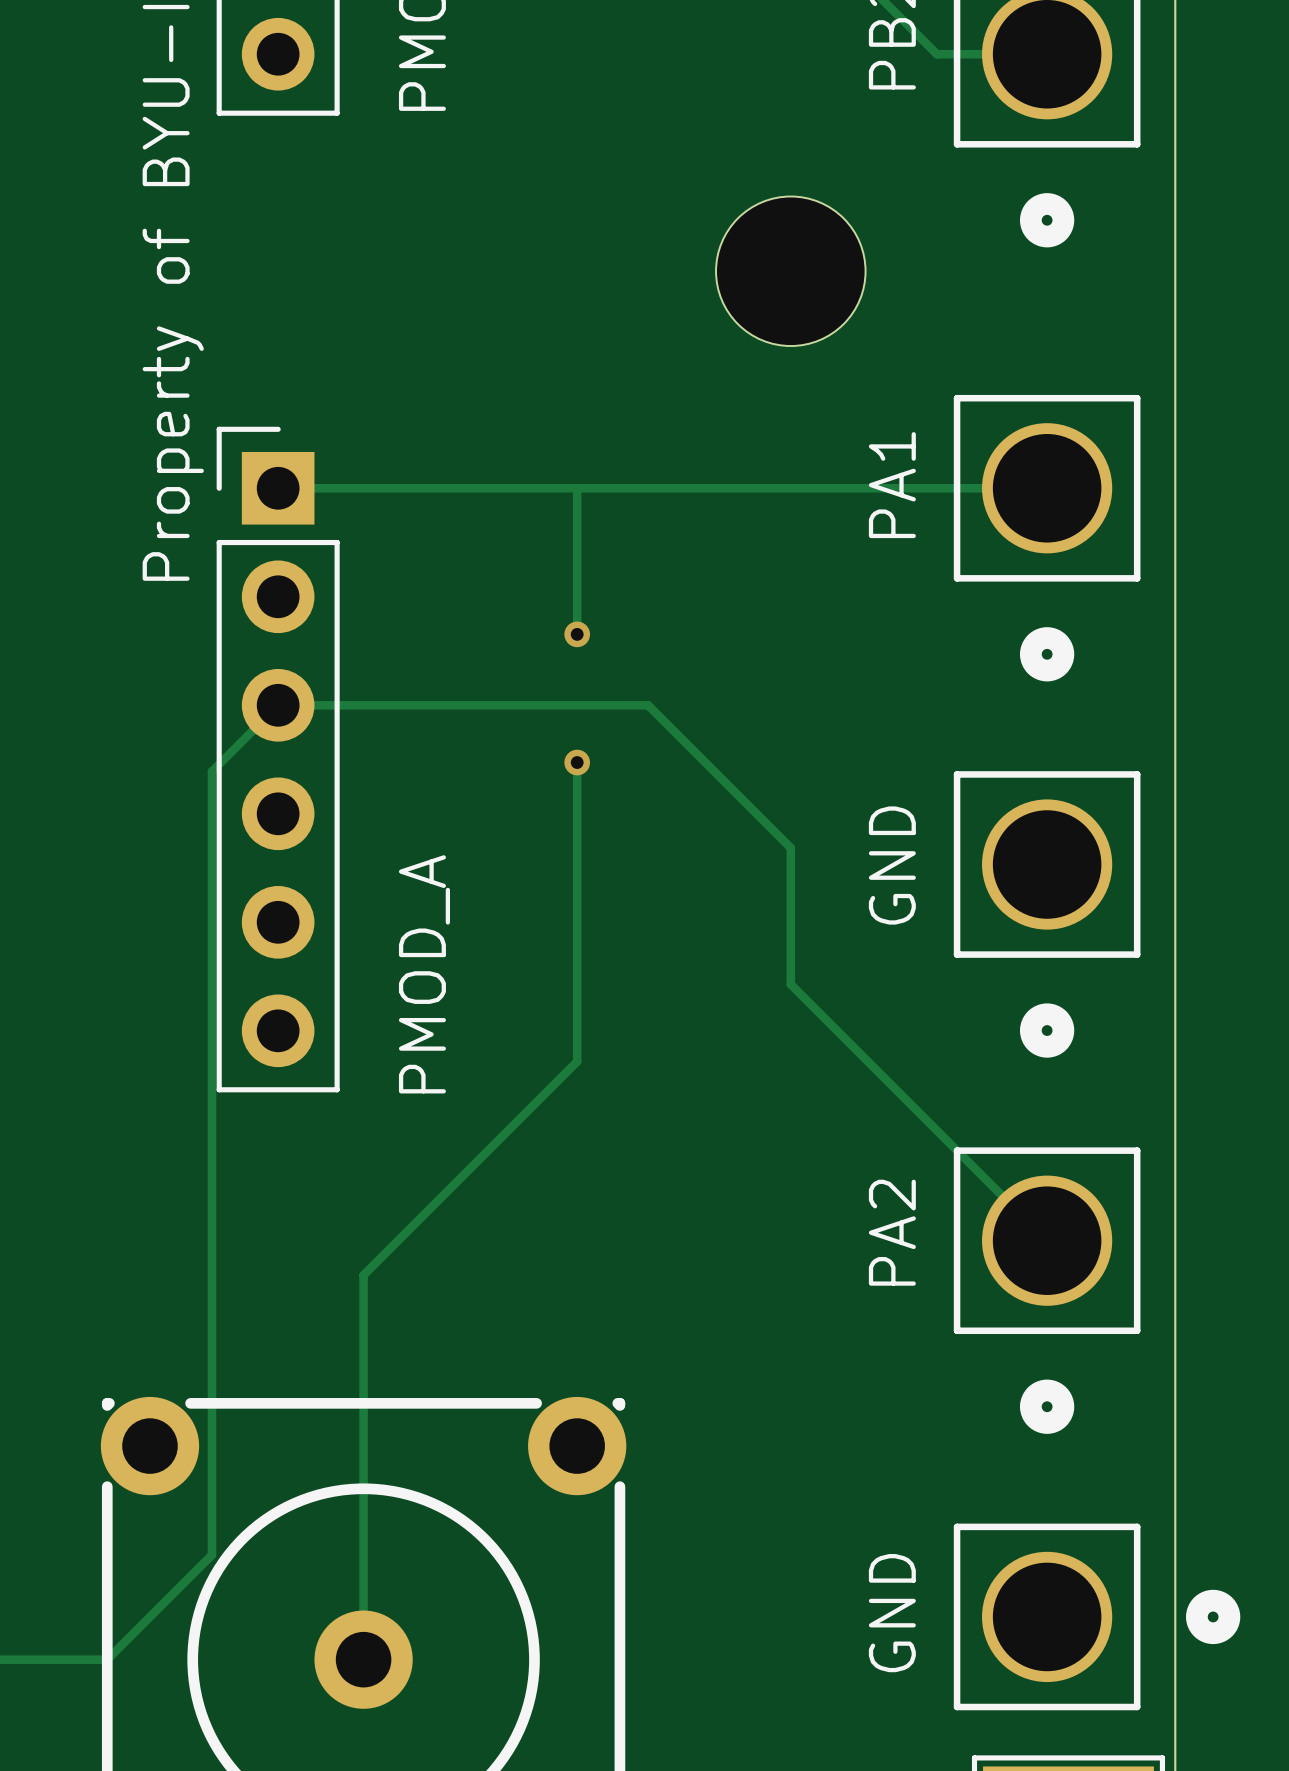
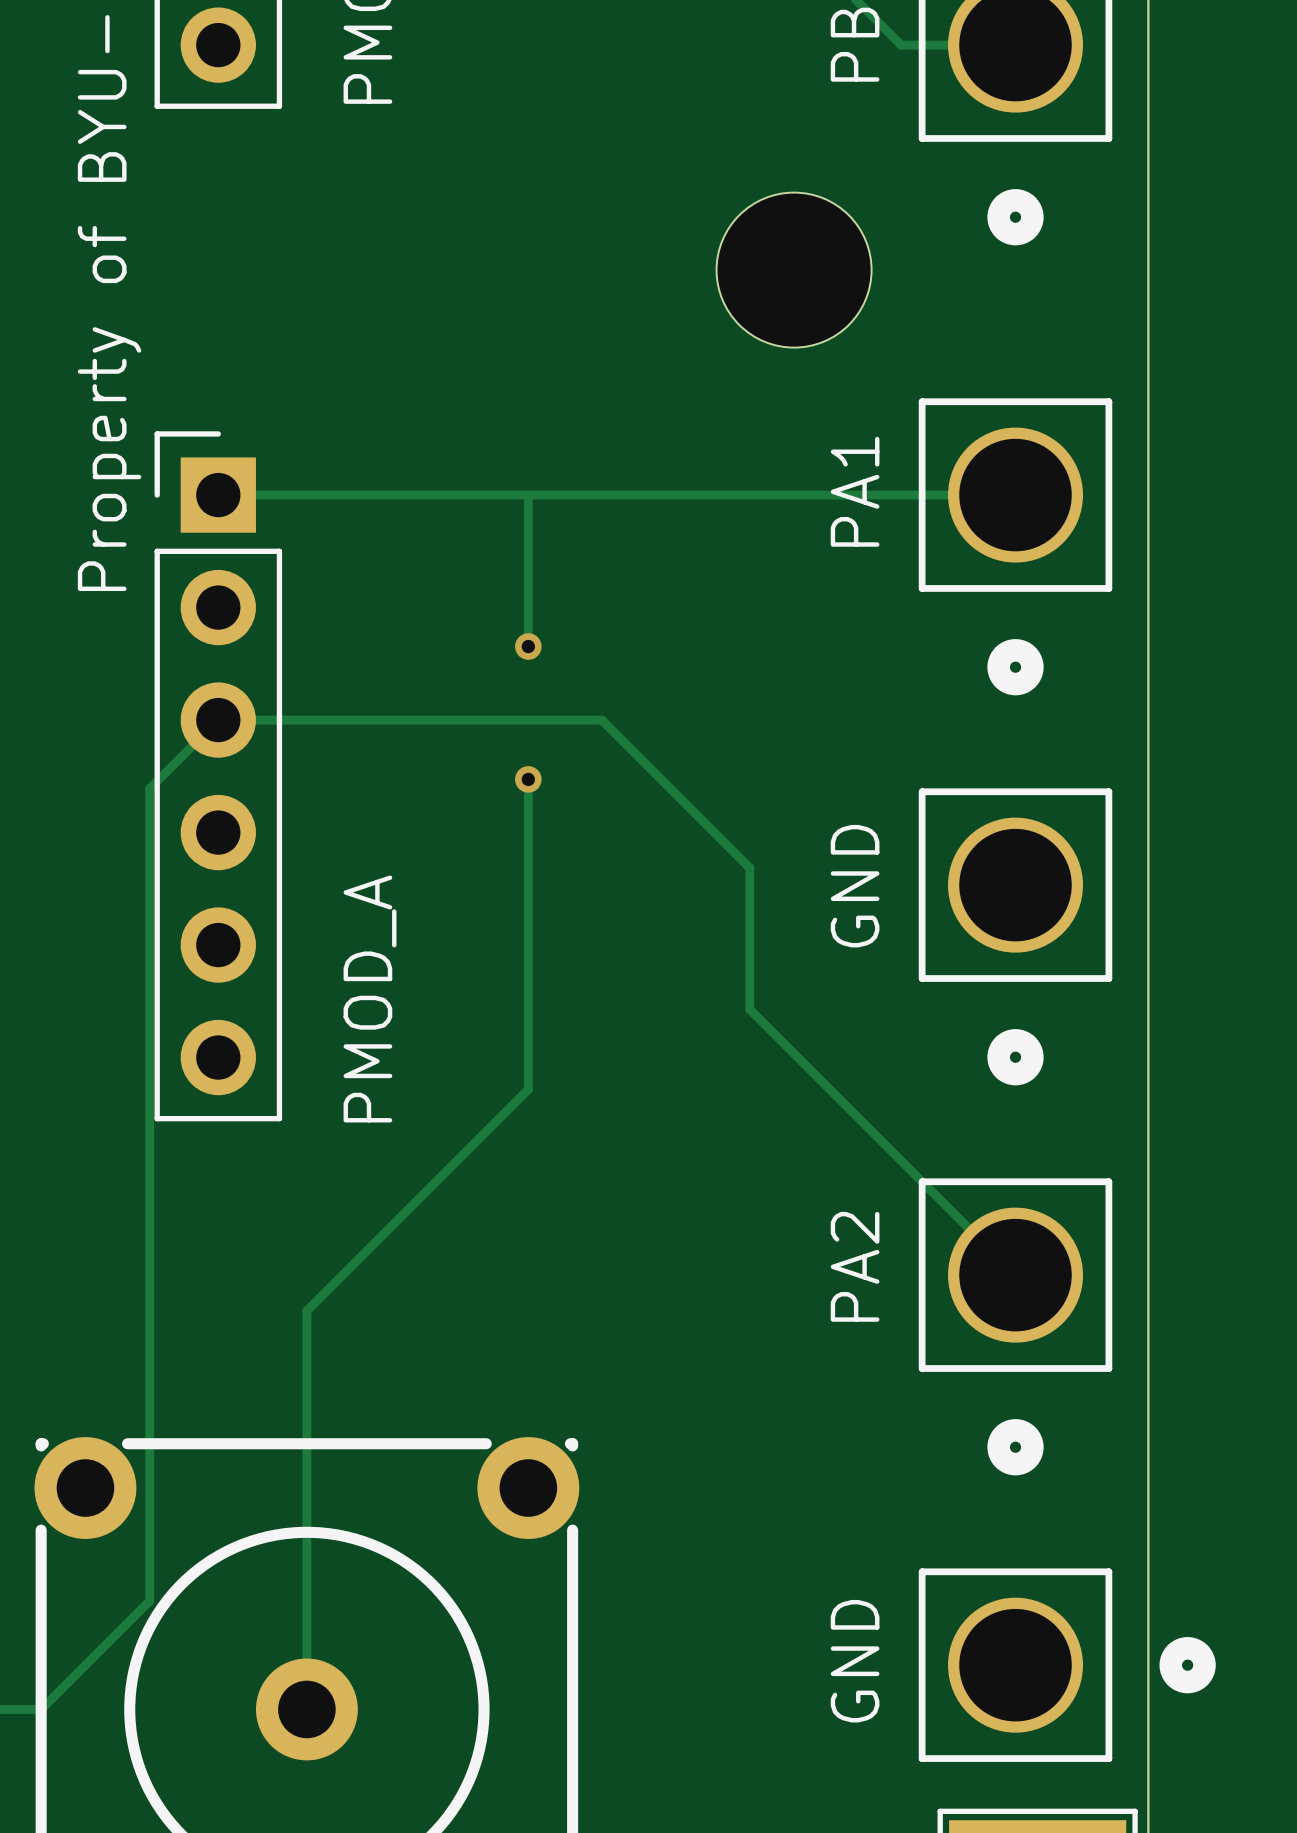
part position: (790, 271) -> (794, 270)

